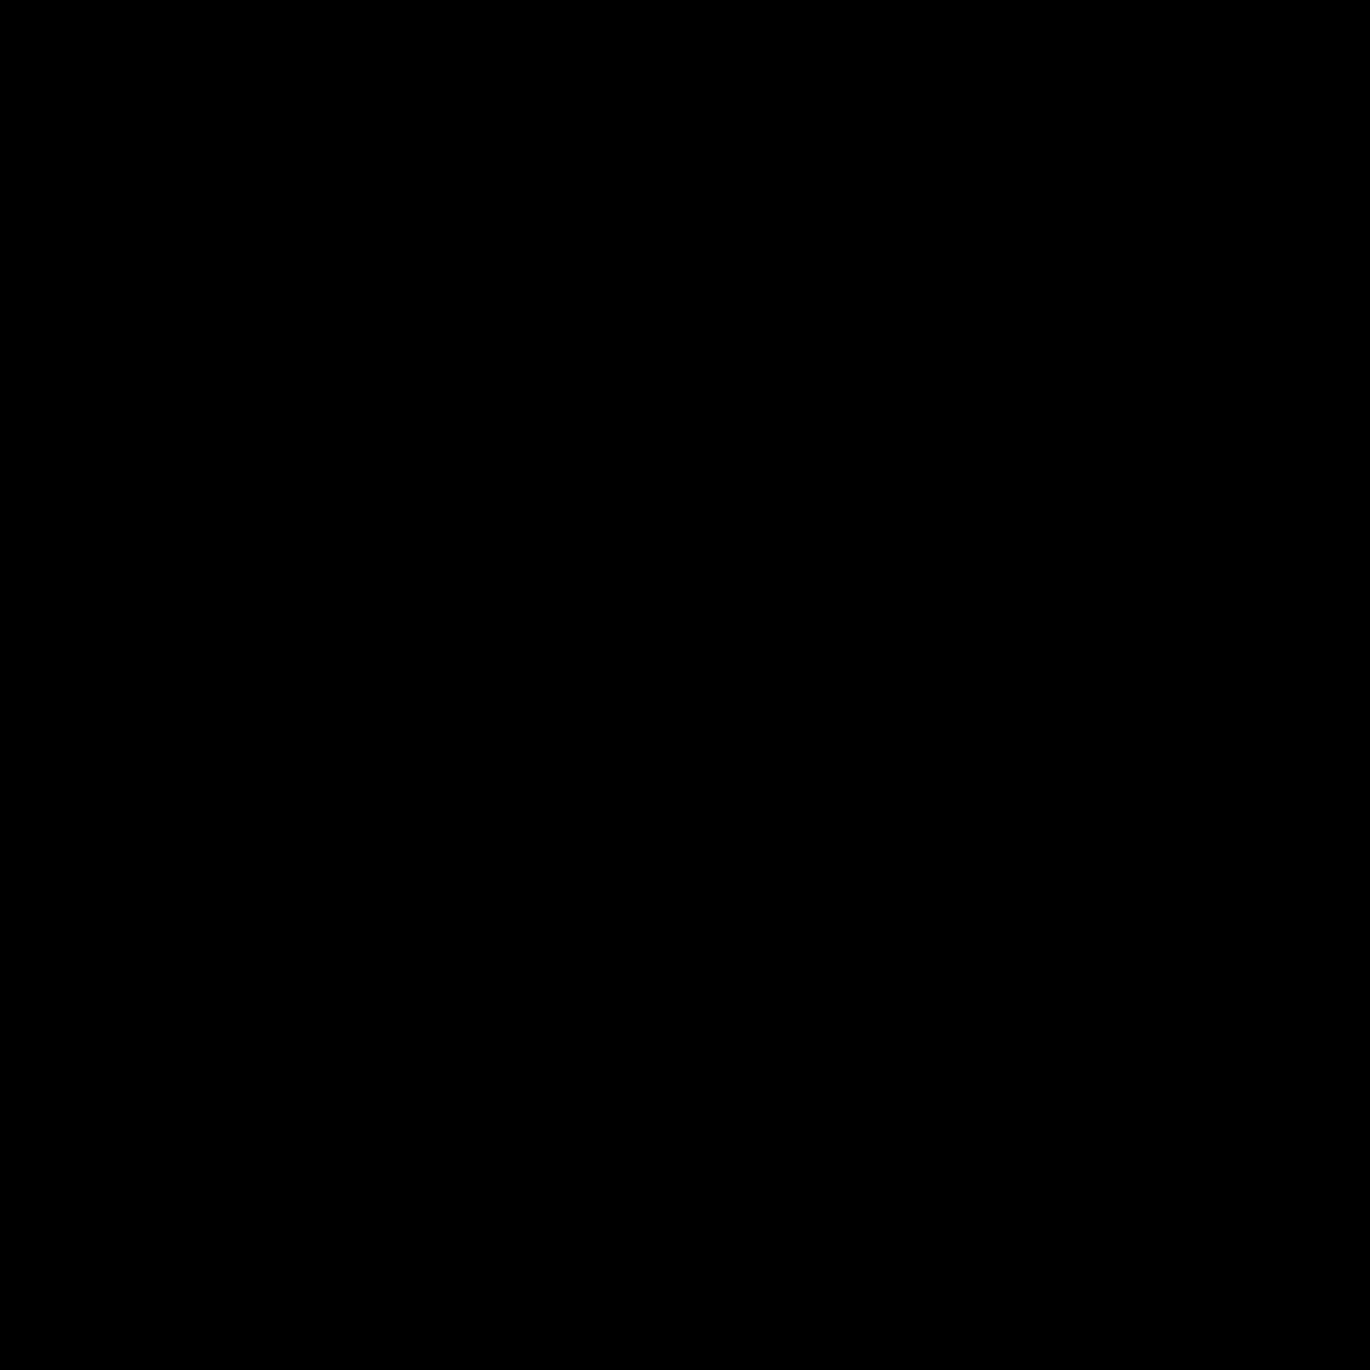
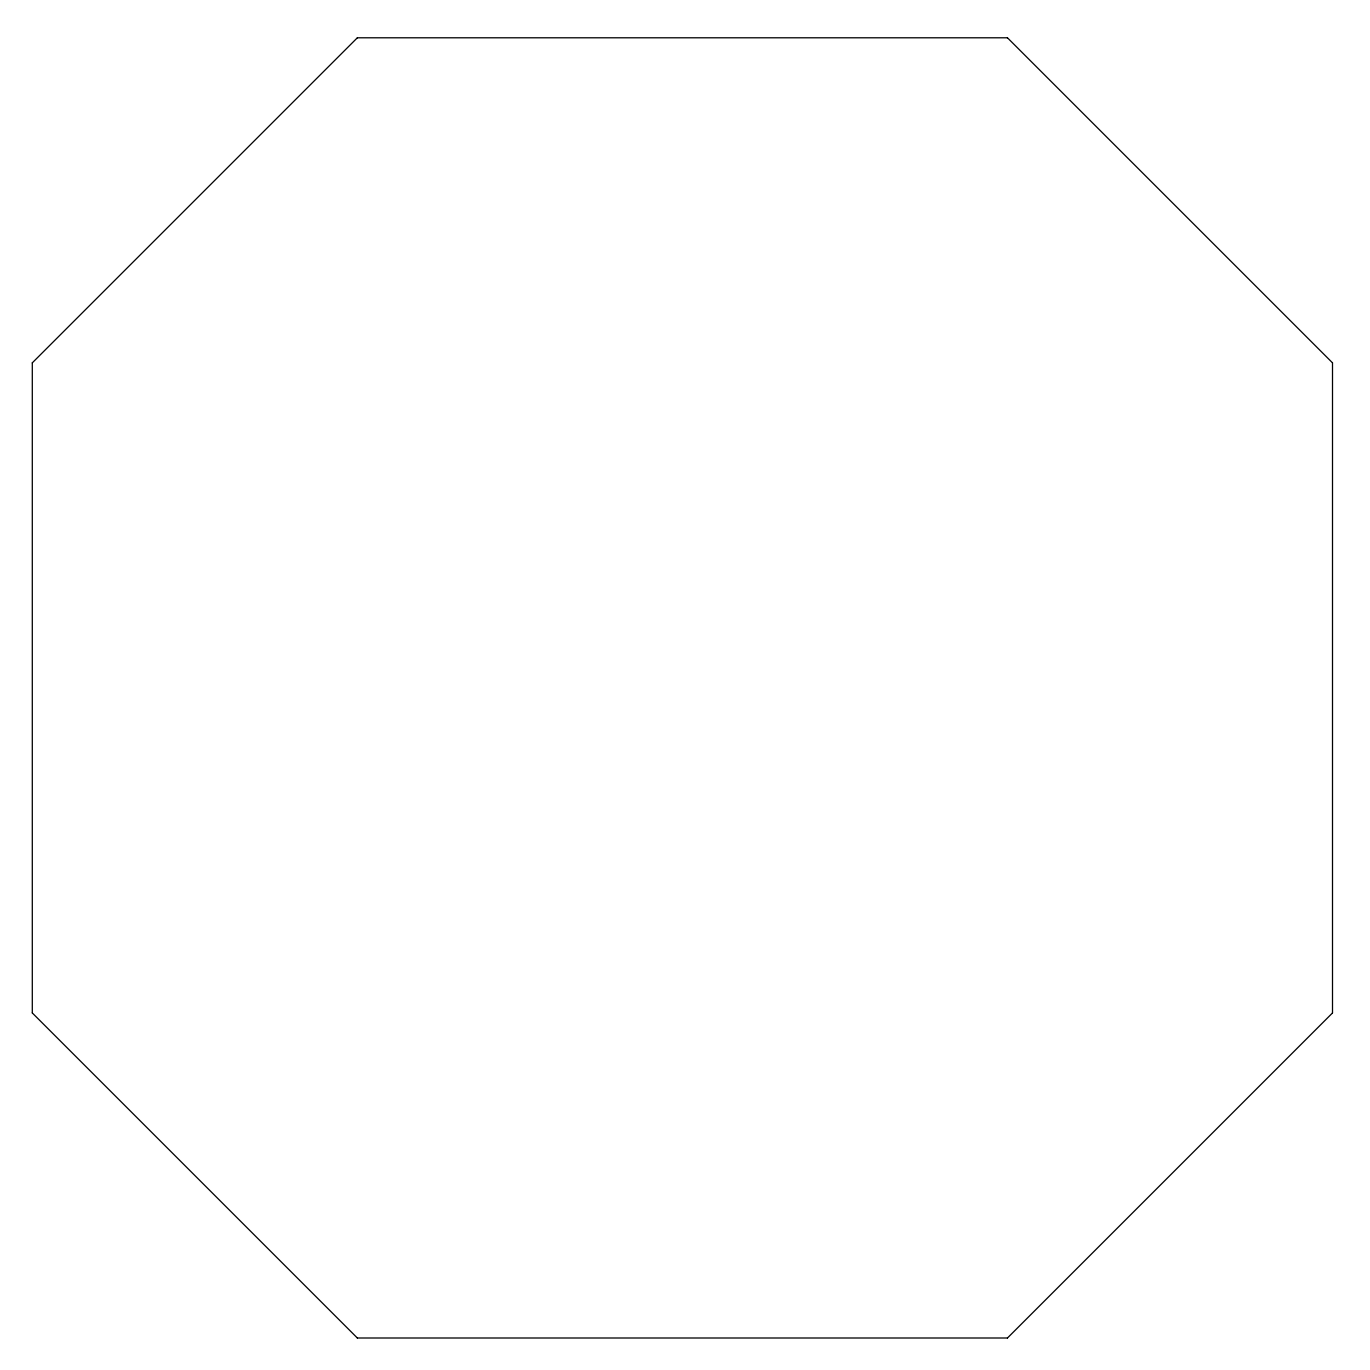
board edge: none -> (357, 37) (1007, 37) (1332, 362) (1332, 1012) (1007, 1337) (357, 1337) (32, 1012) (32, 362) (357, 37)

